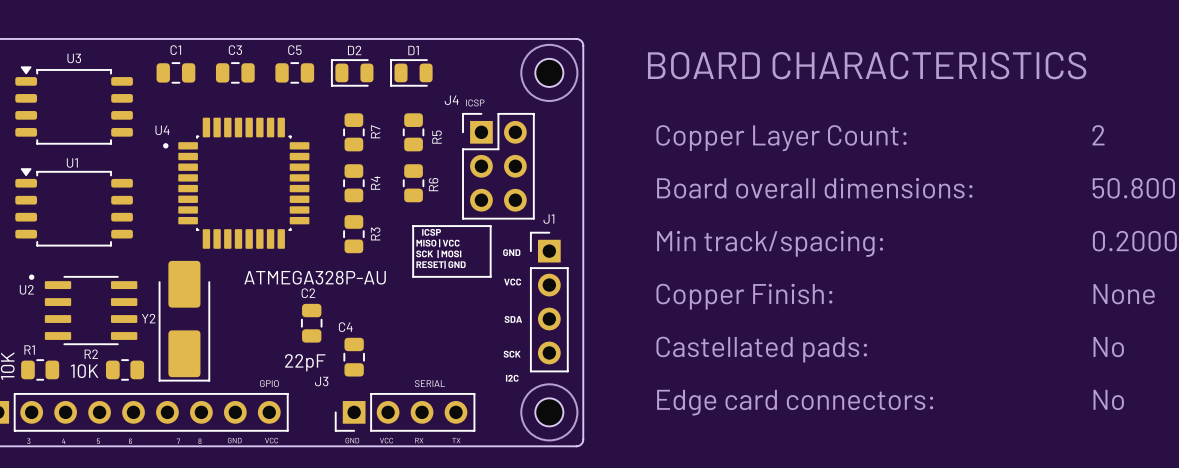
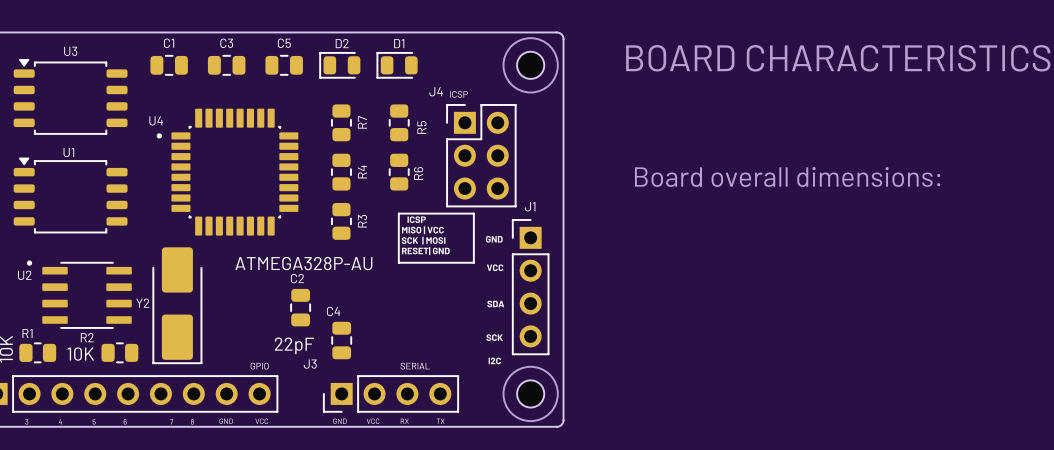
text: Copper Layer Count: (781, 138) -> none
text: Min track/spacing: (770, 243) -> none
text: Copper Finish: (744, 296) -> none
text: Castellated pads: (761, 349) -> none
text: Edge card connectors: (795, 402) -> none

